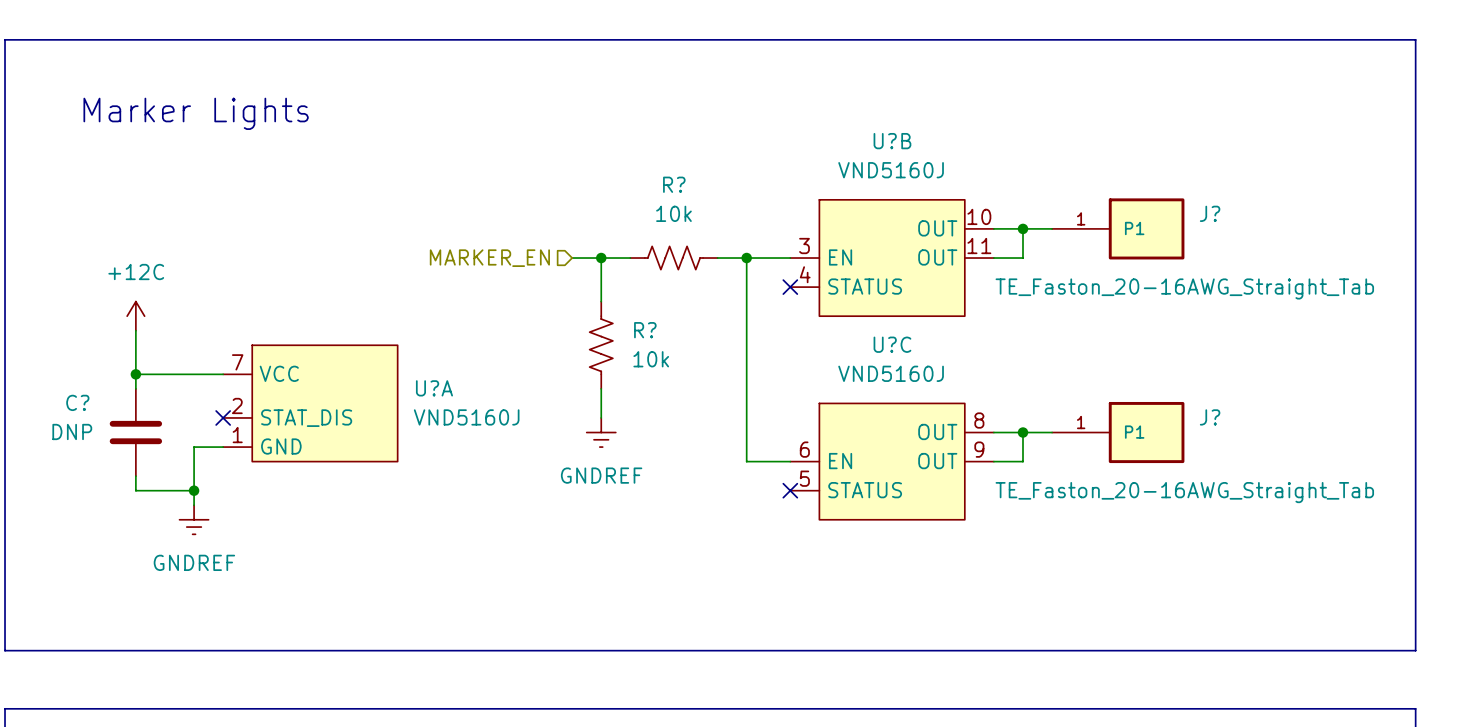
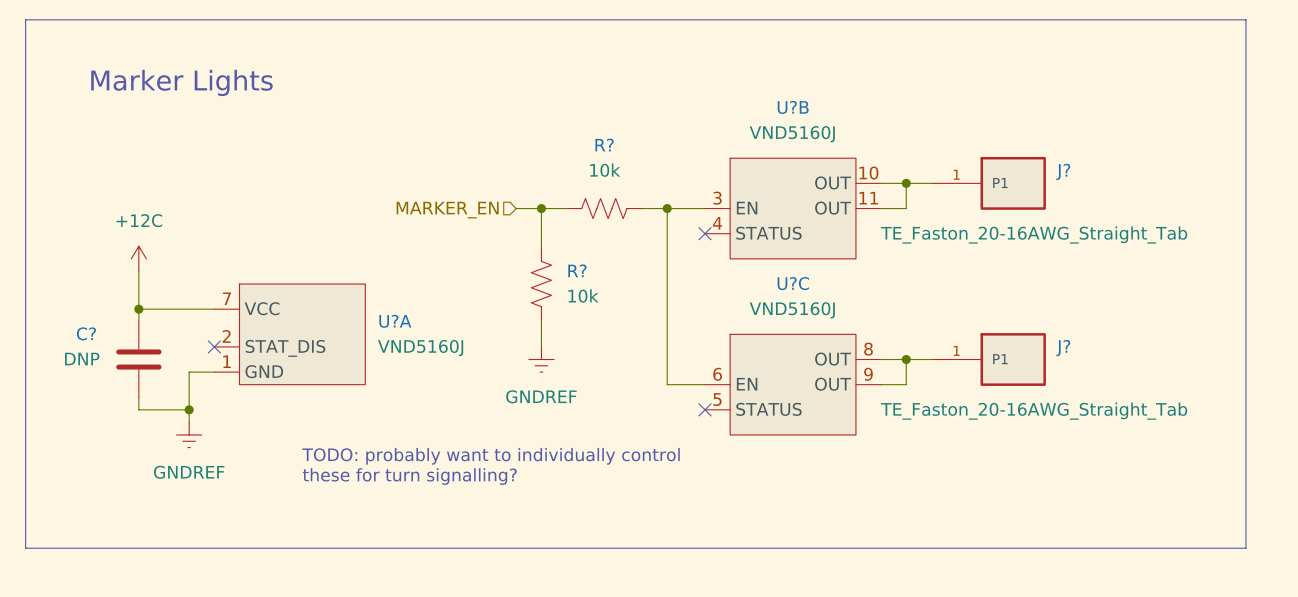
text: none -> TODO: probably want to individually control (491, 456)
text: none -> these for turn signalling? (409, 476)

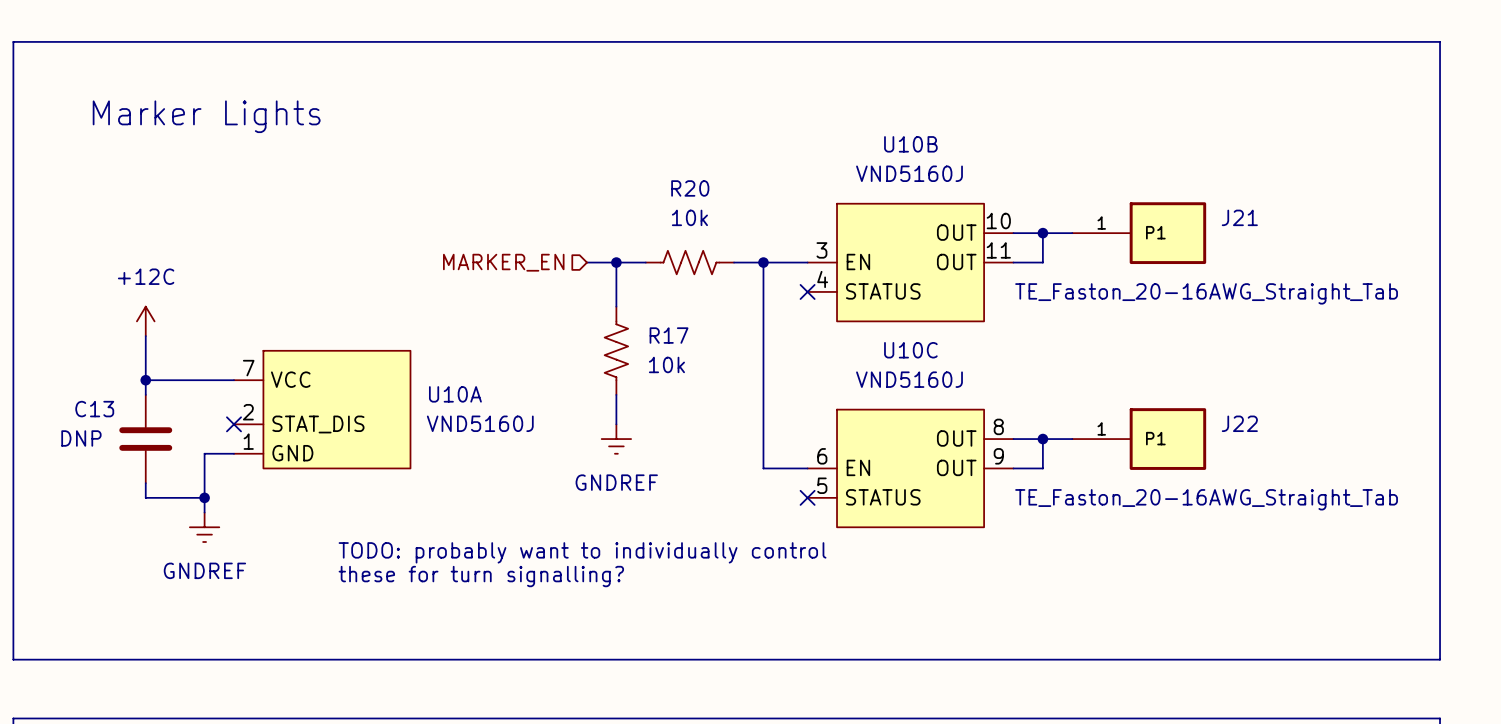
U?B name: U?B (793, 107) -> U10B (910, 144)
R? name: R? (604, 145) -> R20 (690, 188)
J? name: J? (1063, 171) -> J21 (1239, 217)
R? name: R? (577, 270) -> R17 (669, 335)
U?C name: U?C (793, 283) -> U10C (910, 350)
U?A name: U?A (395, 321) -> U10A (455, 394)
C? name: C? (86, 333) -> C13 (94, 409)
J? name: J? (1063, 348) -> J22 (1239, 423)

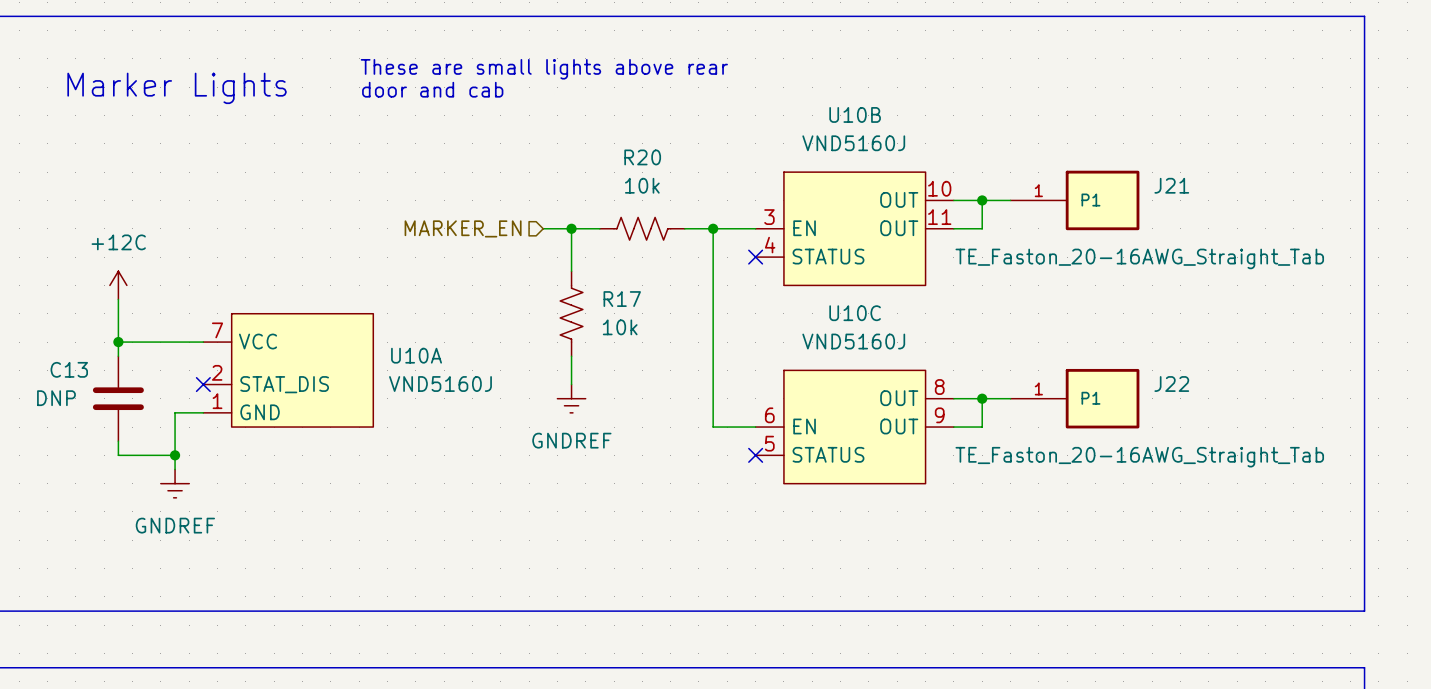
text: none -> These are small lights above rear (544, 69)
text: none -> door and cab (432, 89)
text: TODO: probably want to individually control (582, 552) -> none
text: these for turn signalling? (481, 576) -> none

